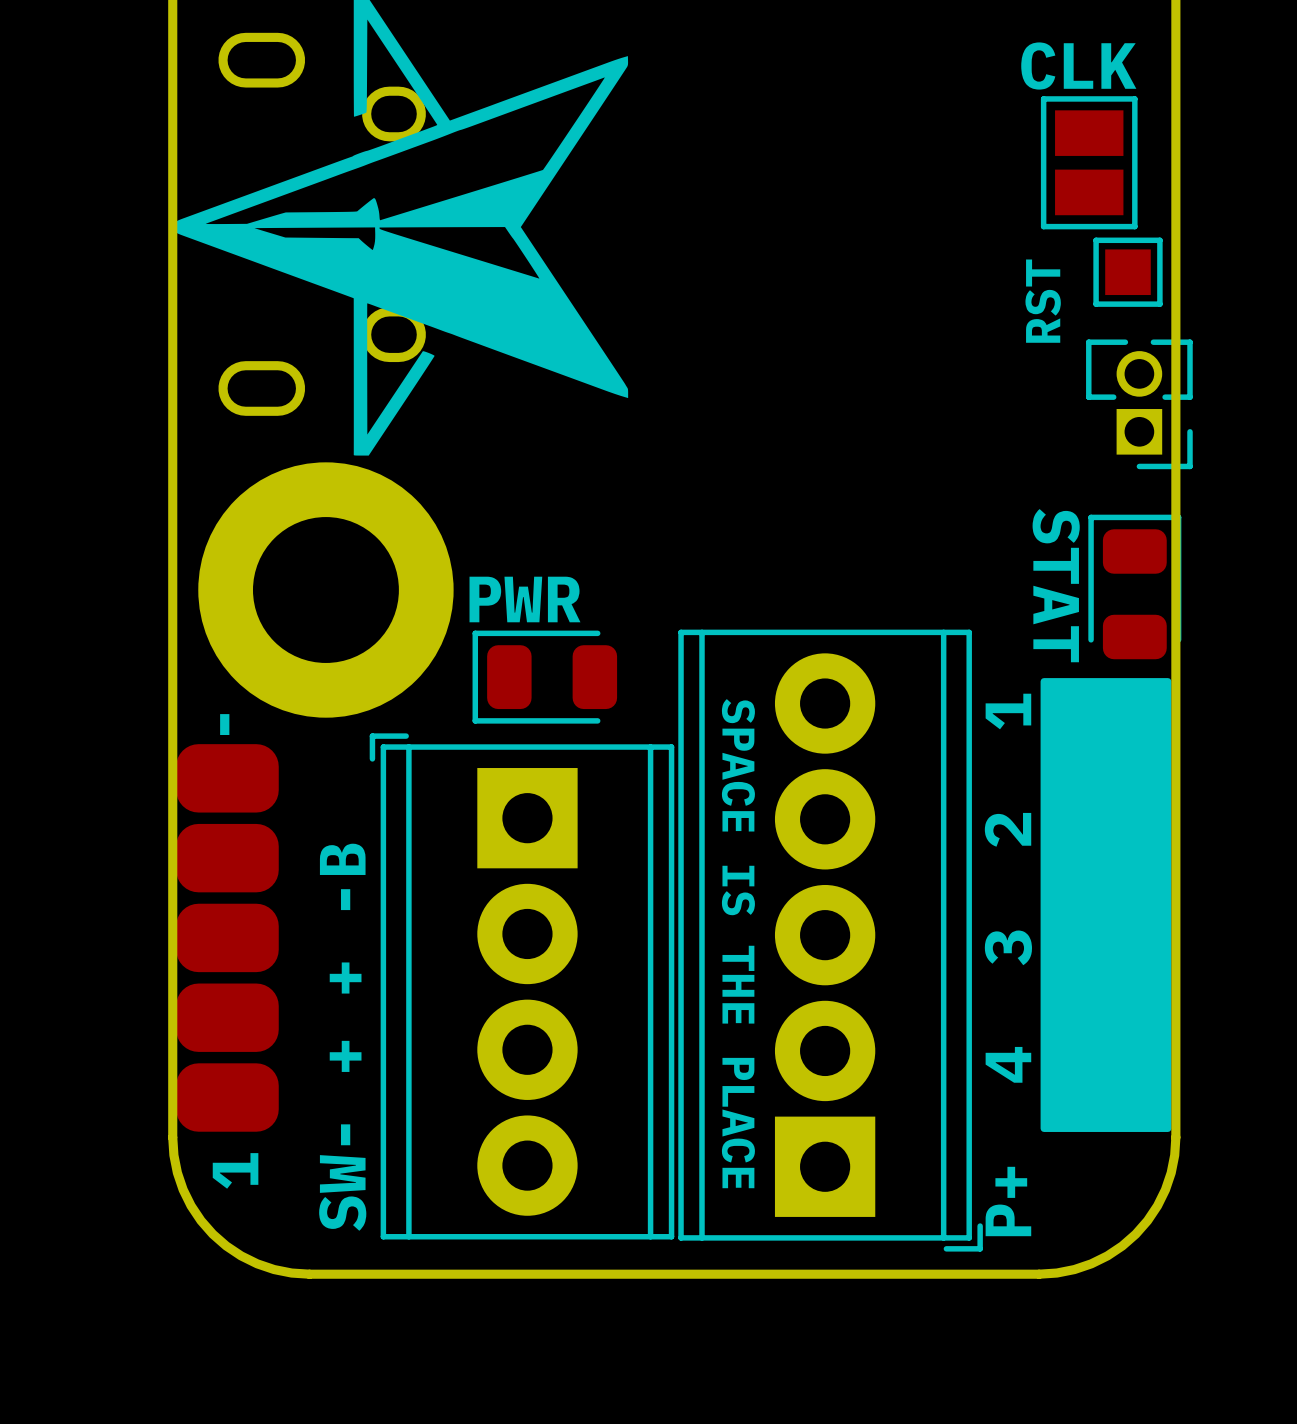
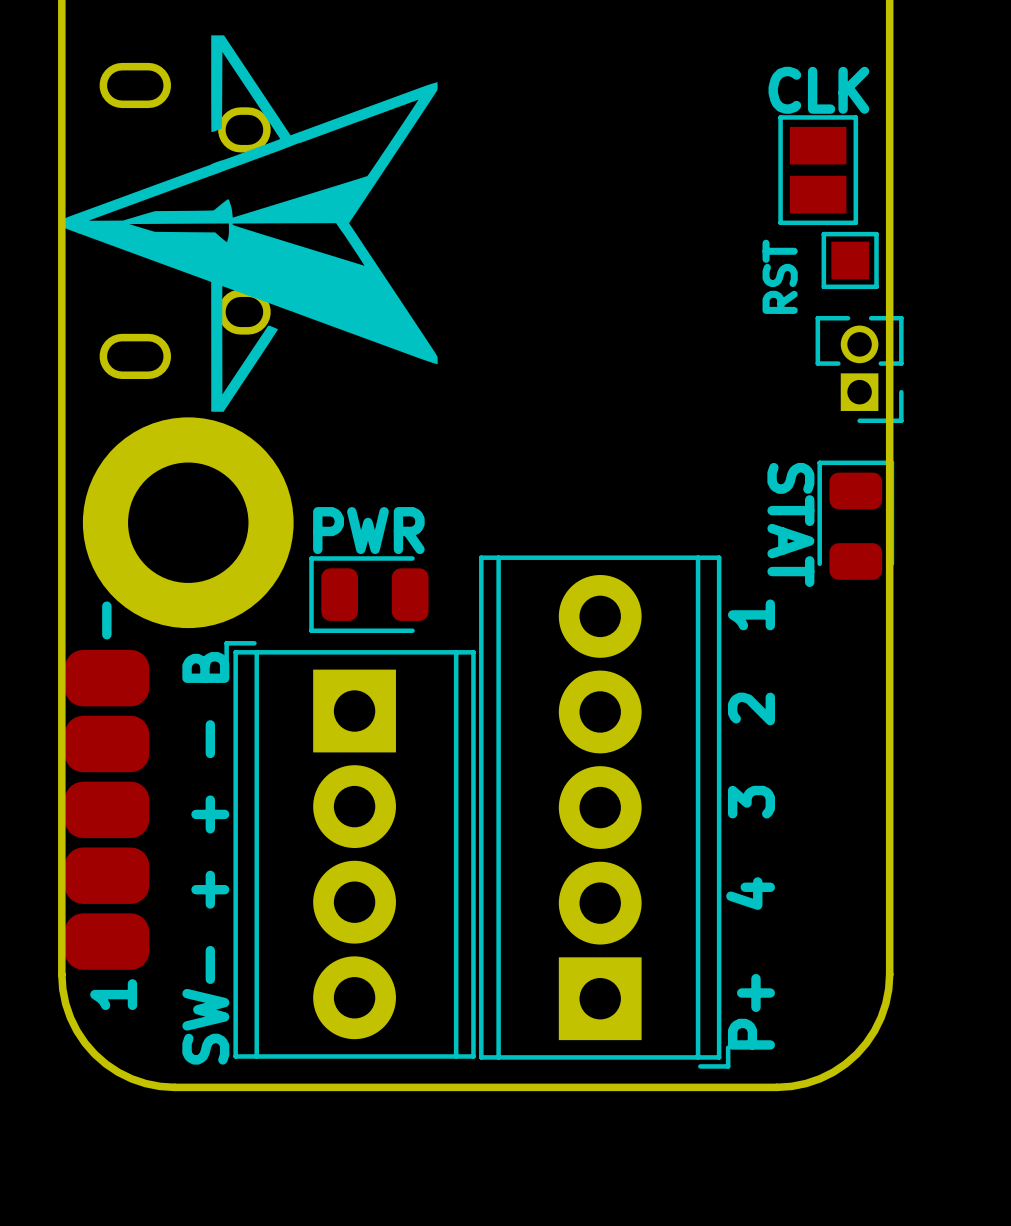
drawing: [1040, 678, 1172, 1132] -> none
text: SPACE IS THE PLACE (738, 943) -> none
text: SW- + + -B (342, 1037) -> SW- + + - B (205, 858)

